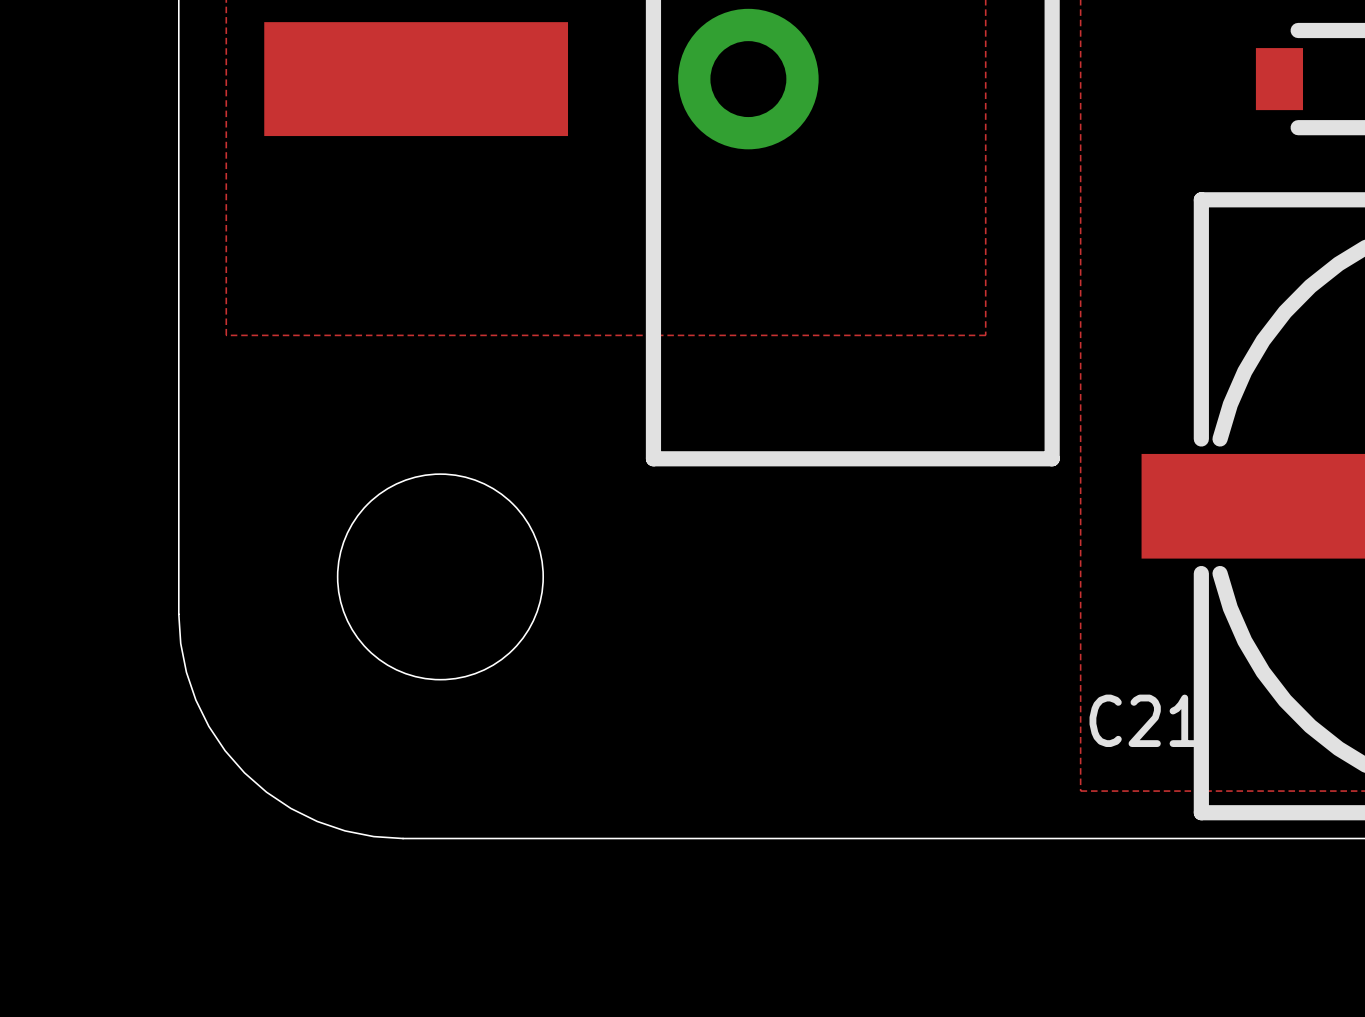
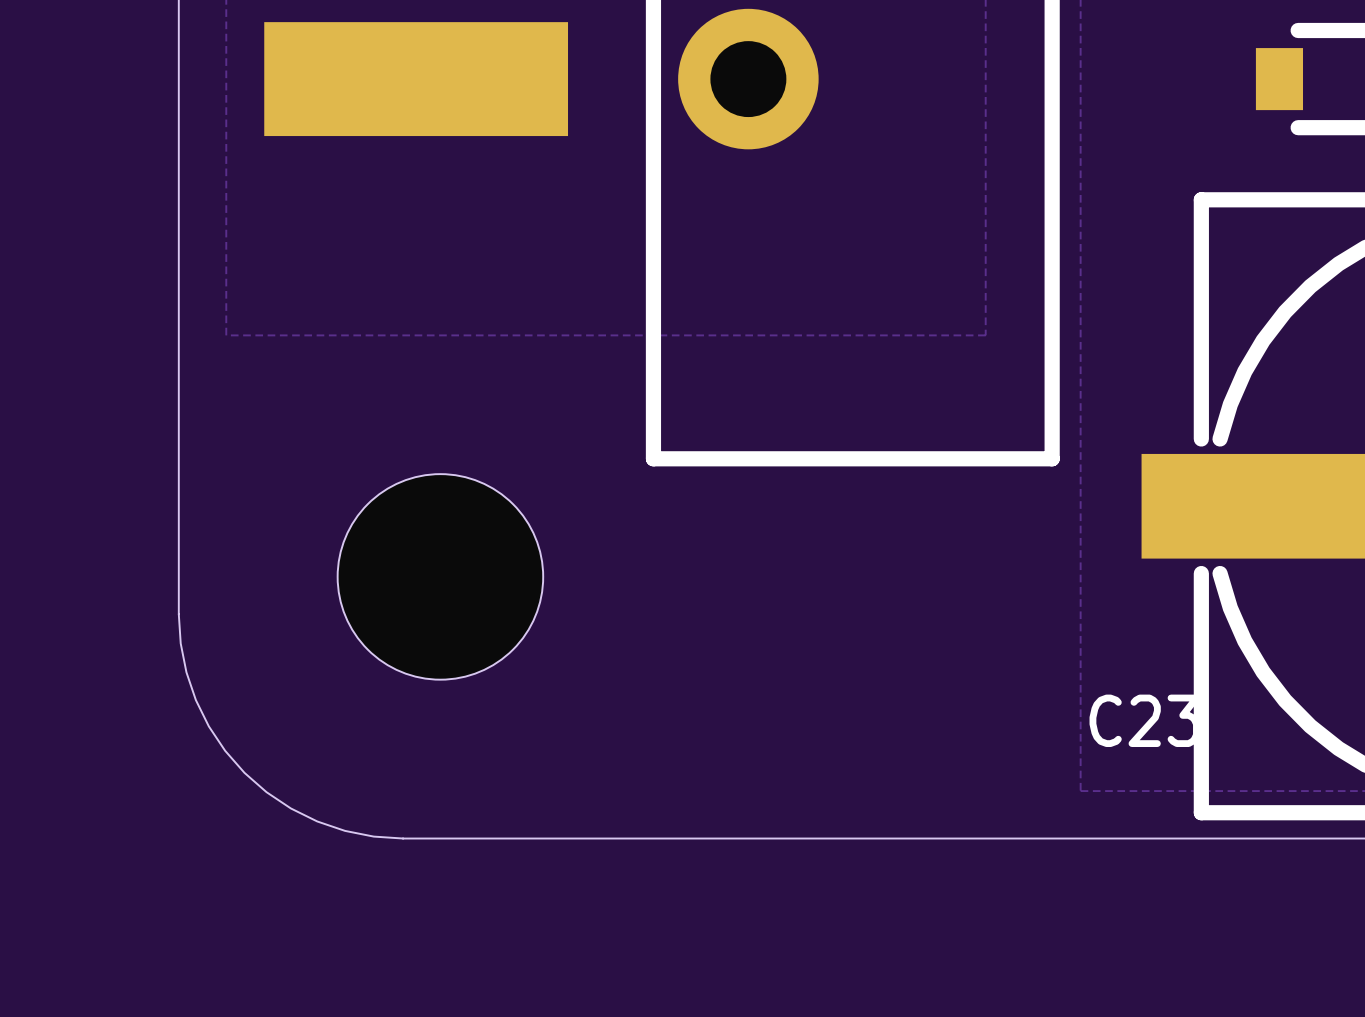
C21 name: C21 (1144, 720) -> C23 (1144, 720)

